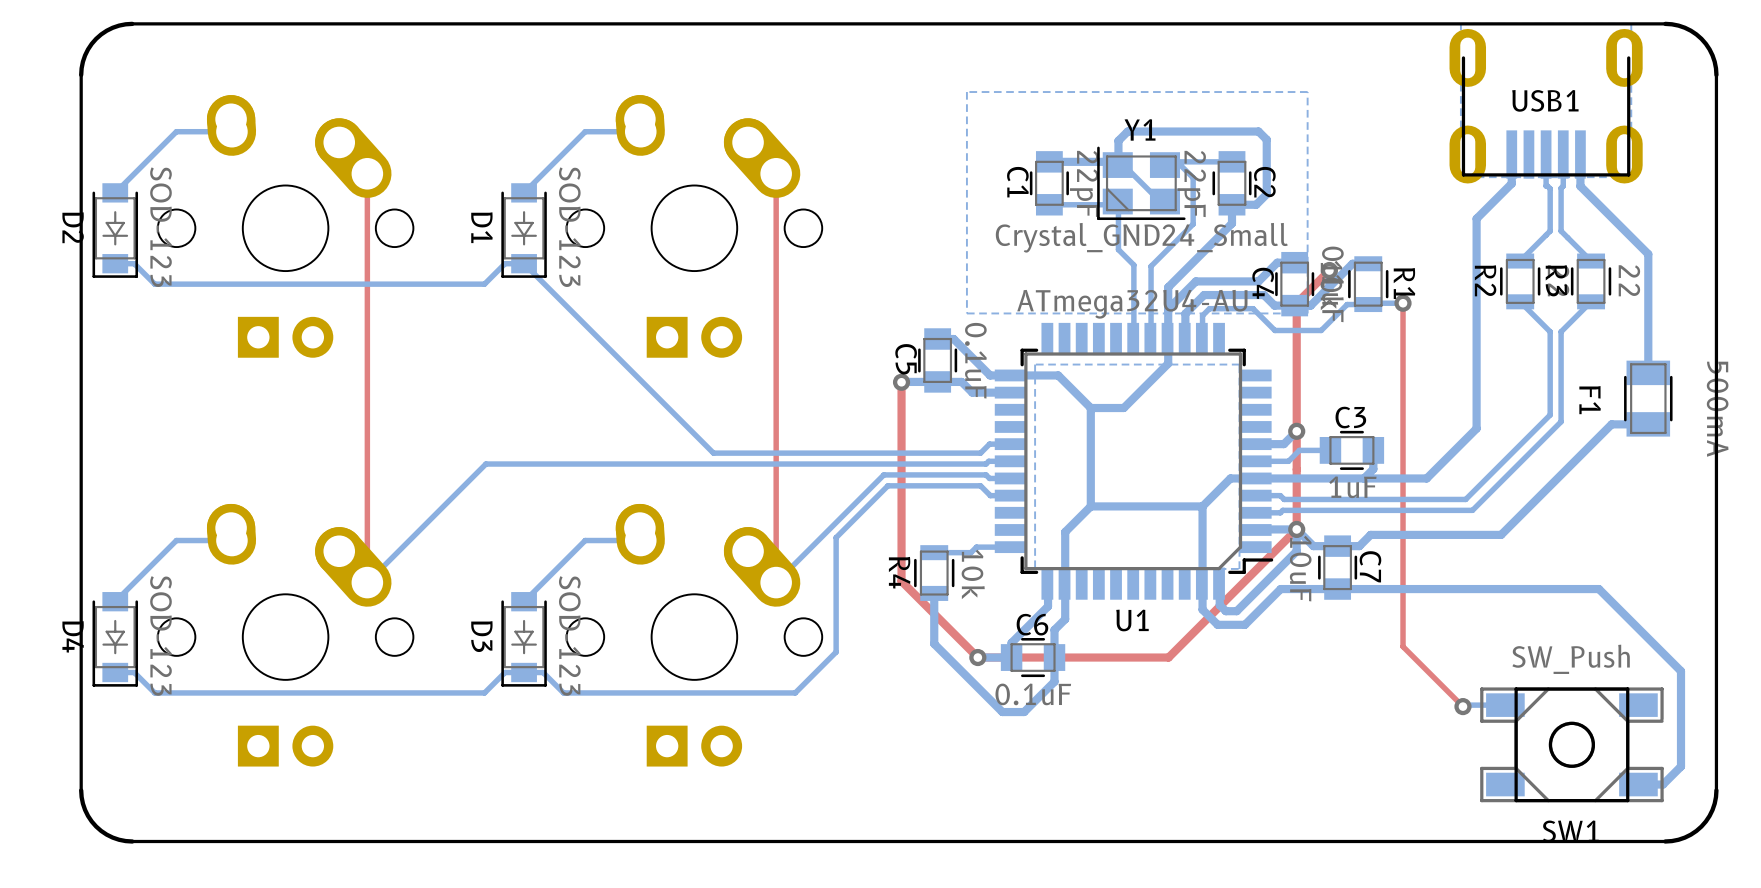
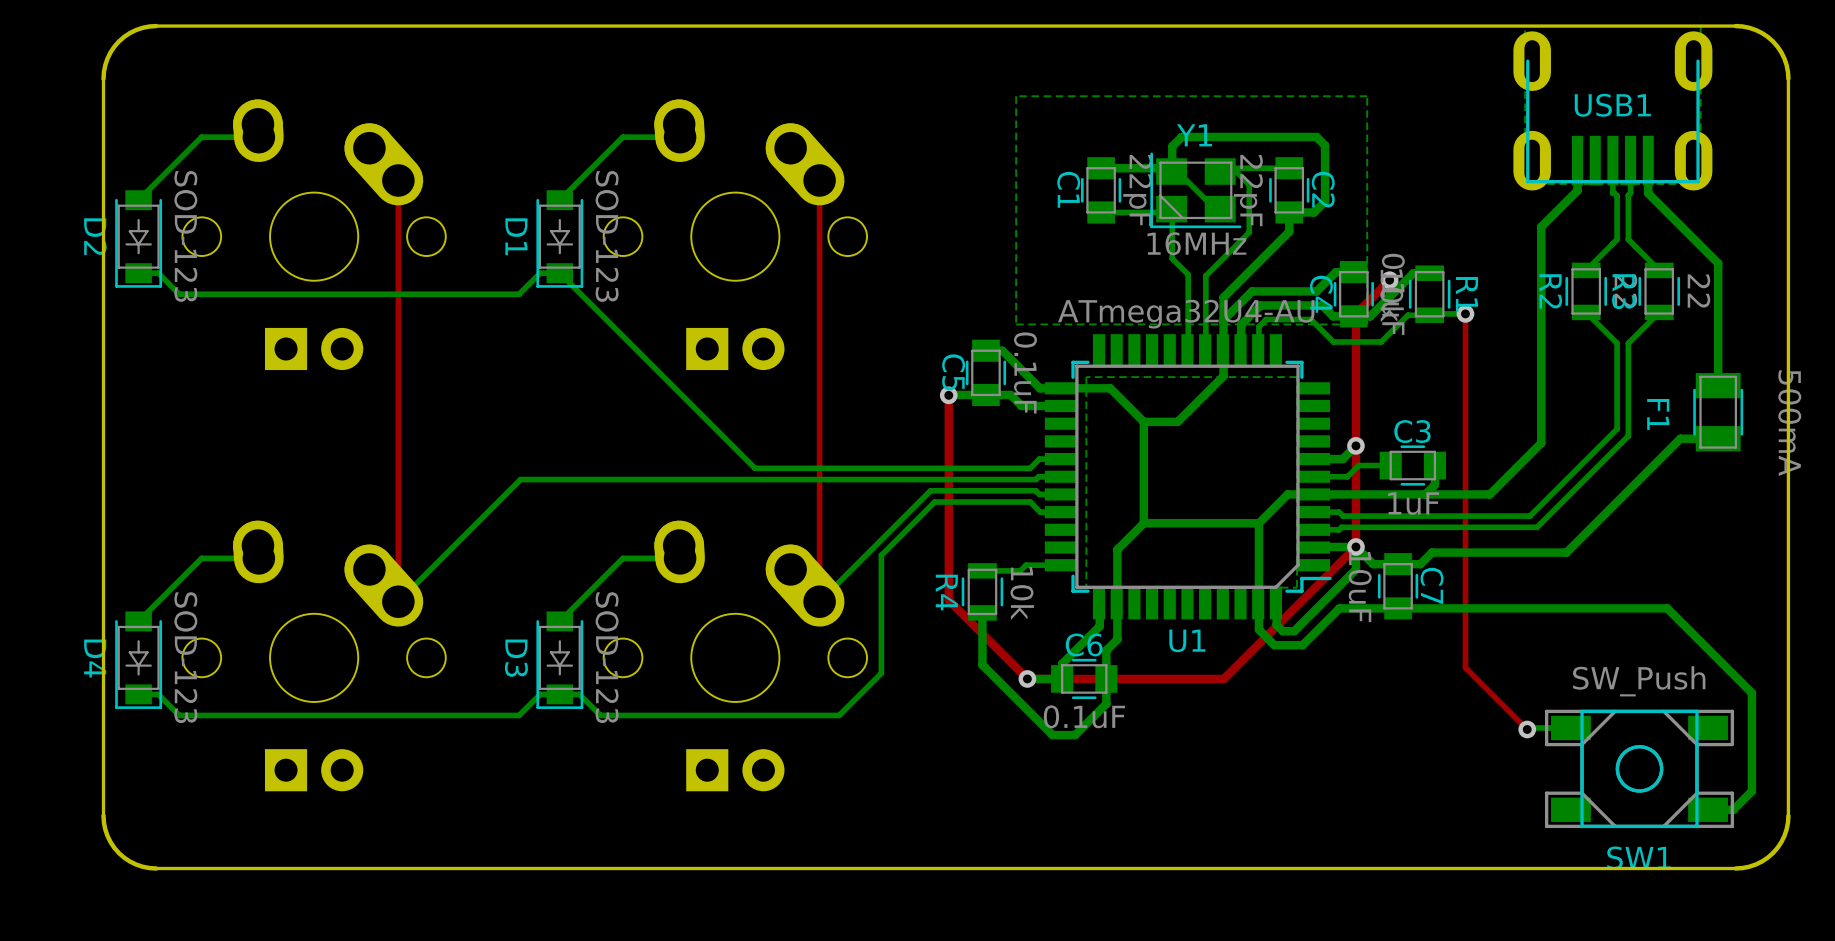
Y1 value: Crystal_GND24_Small (1141, 237) -> 16MHz (1196, 243)

